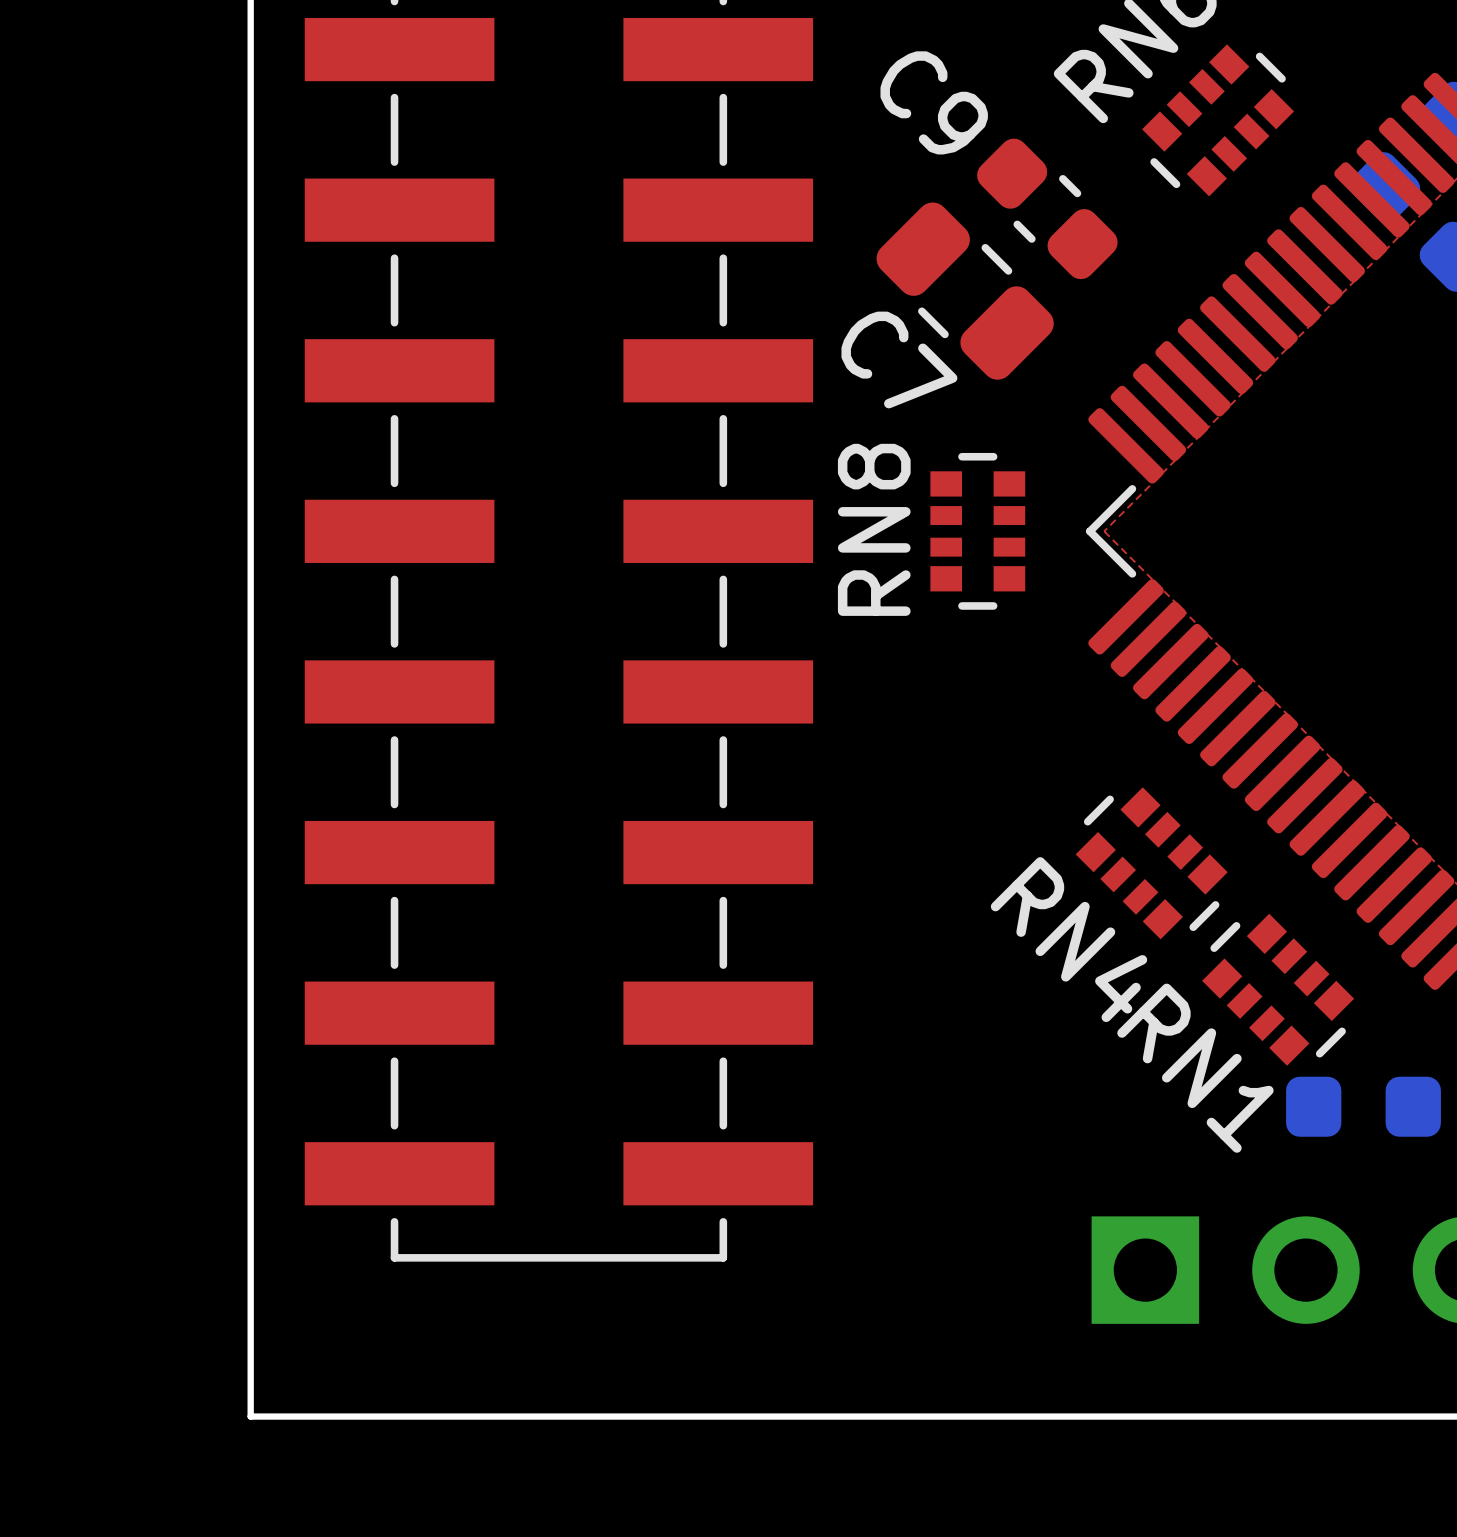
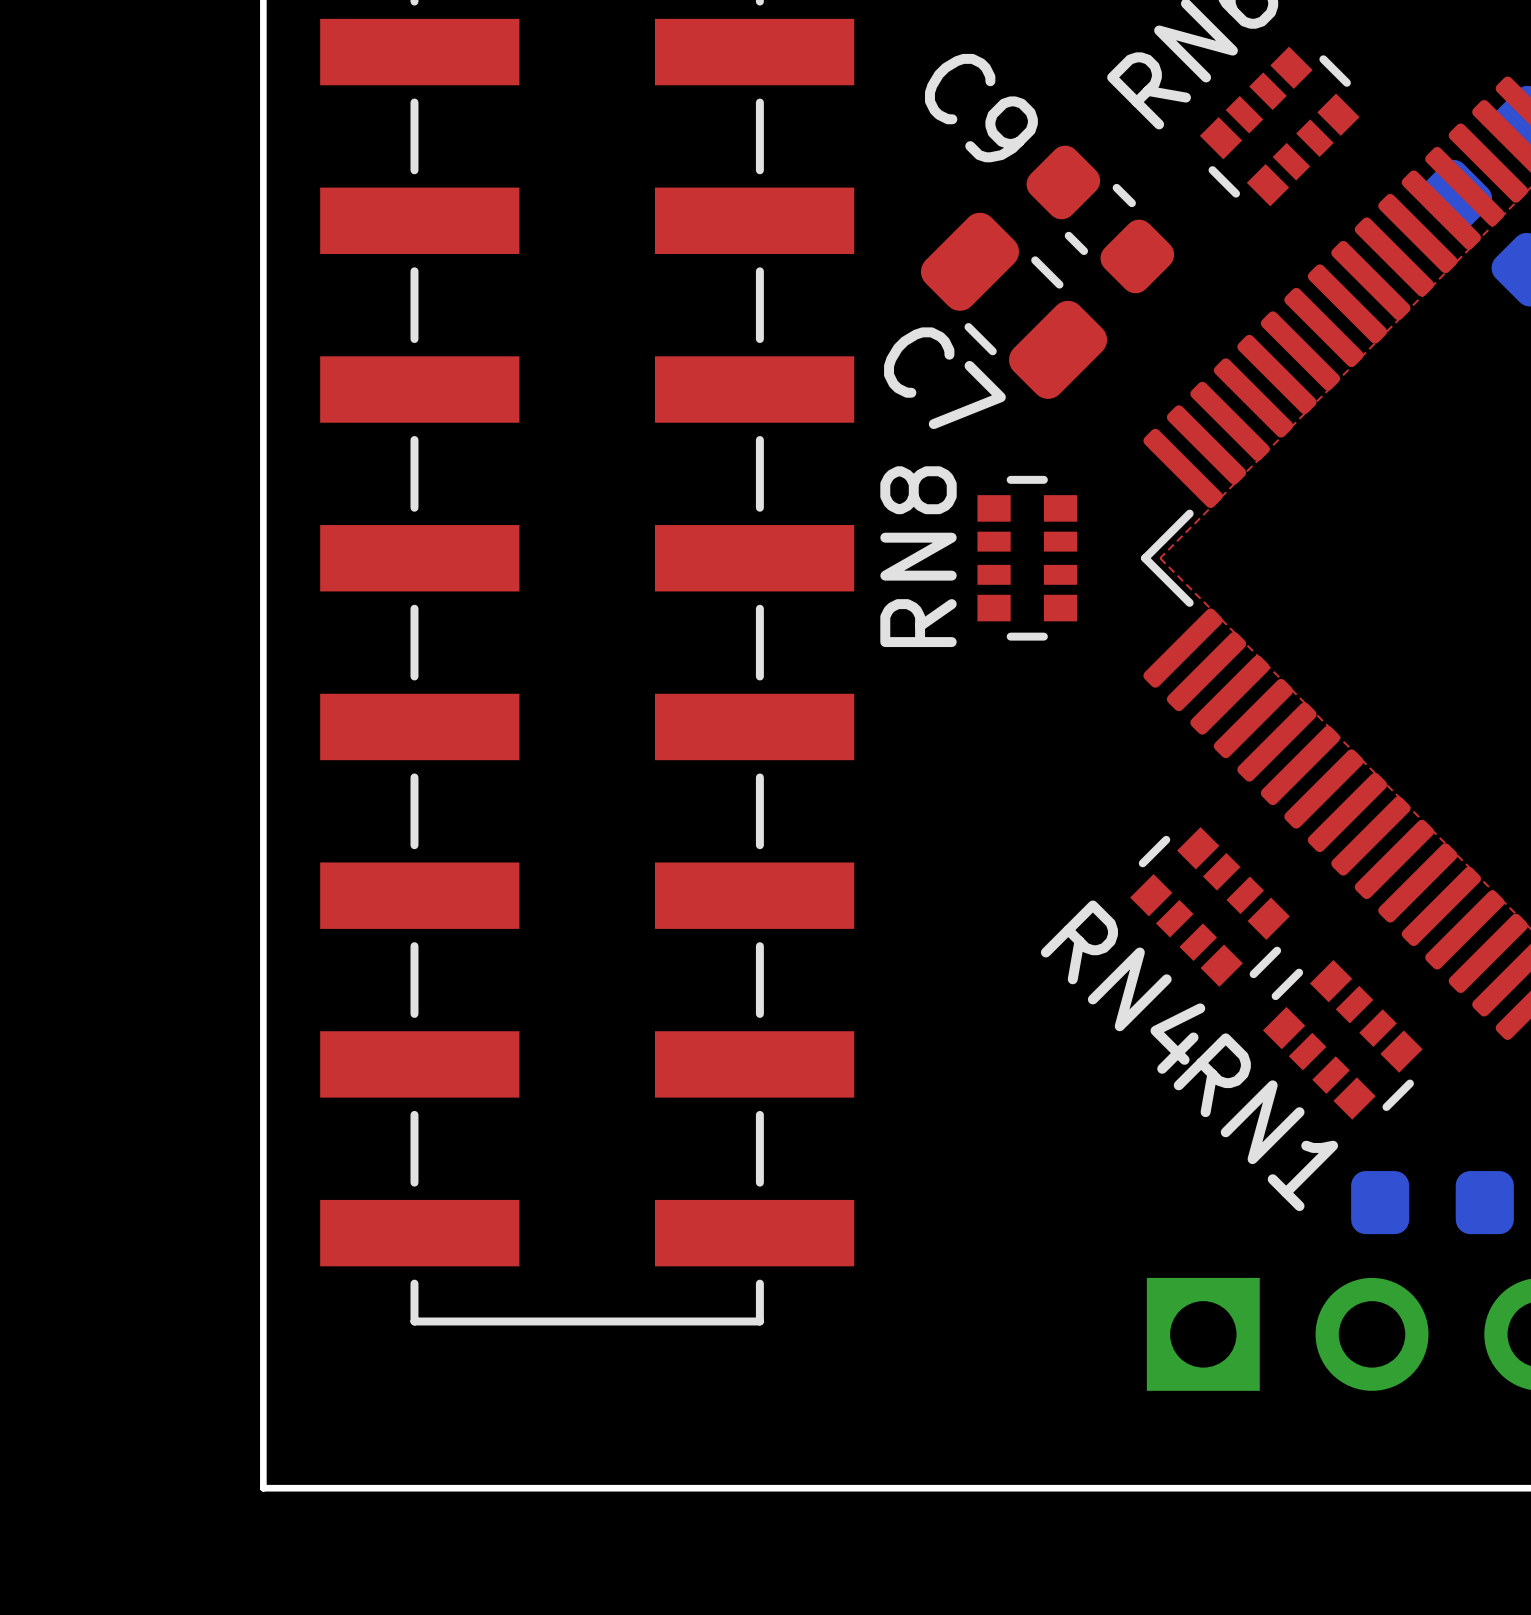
part position: (1363, 1106) -> (1432, 1202)

